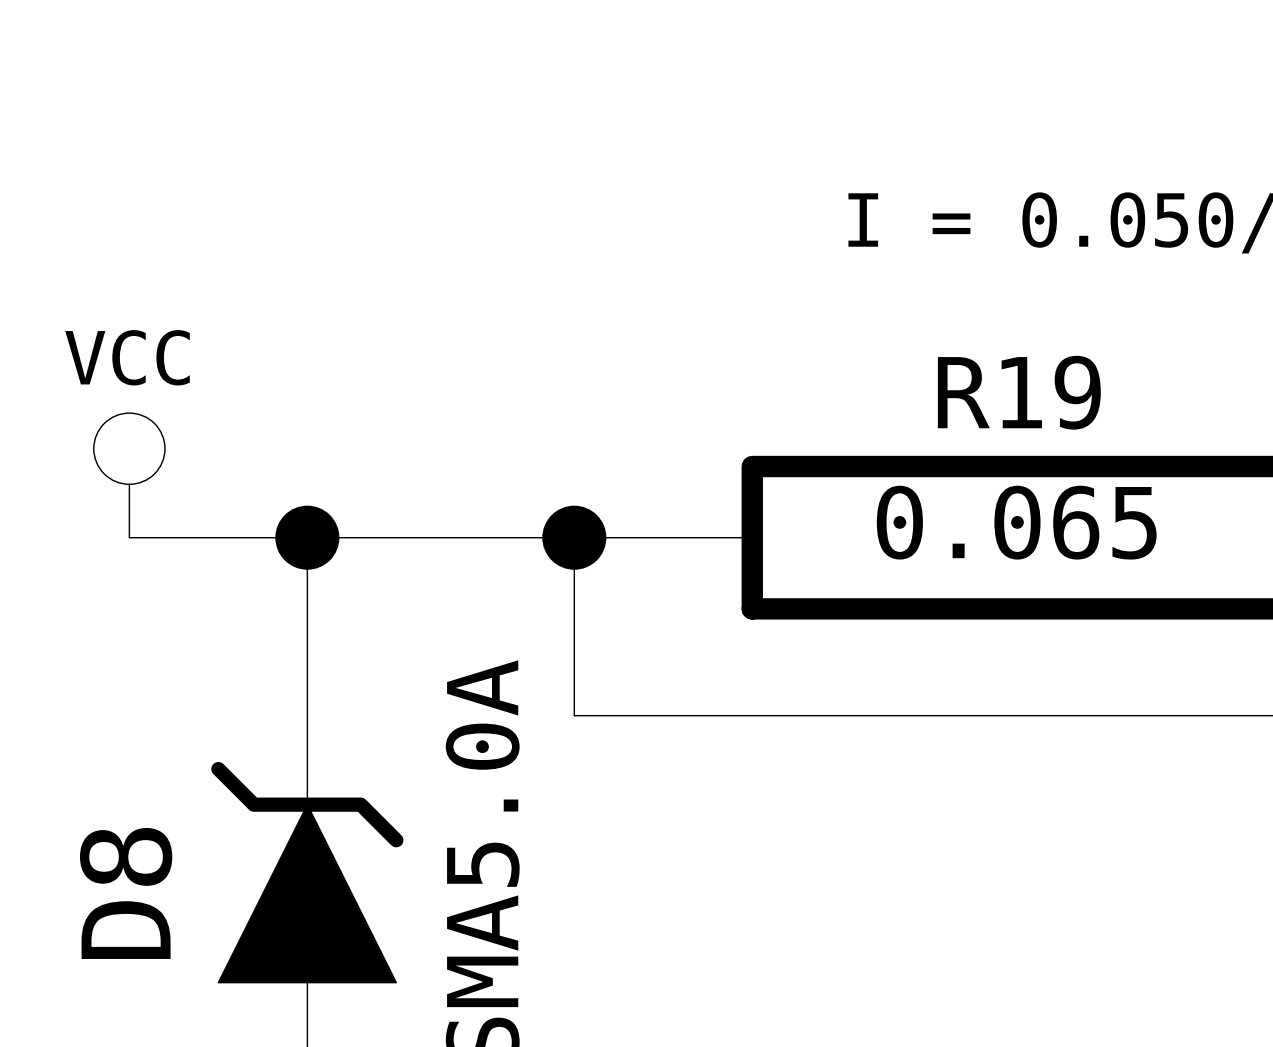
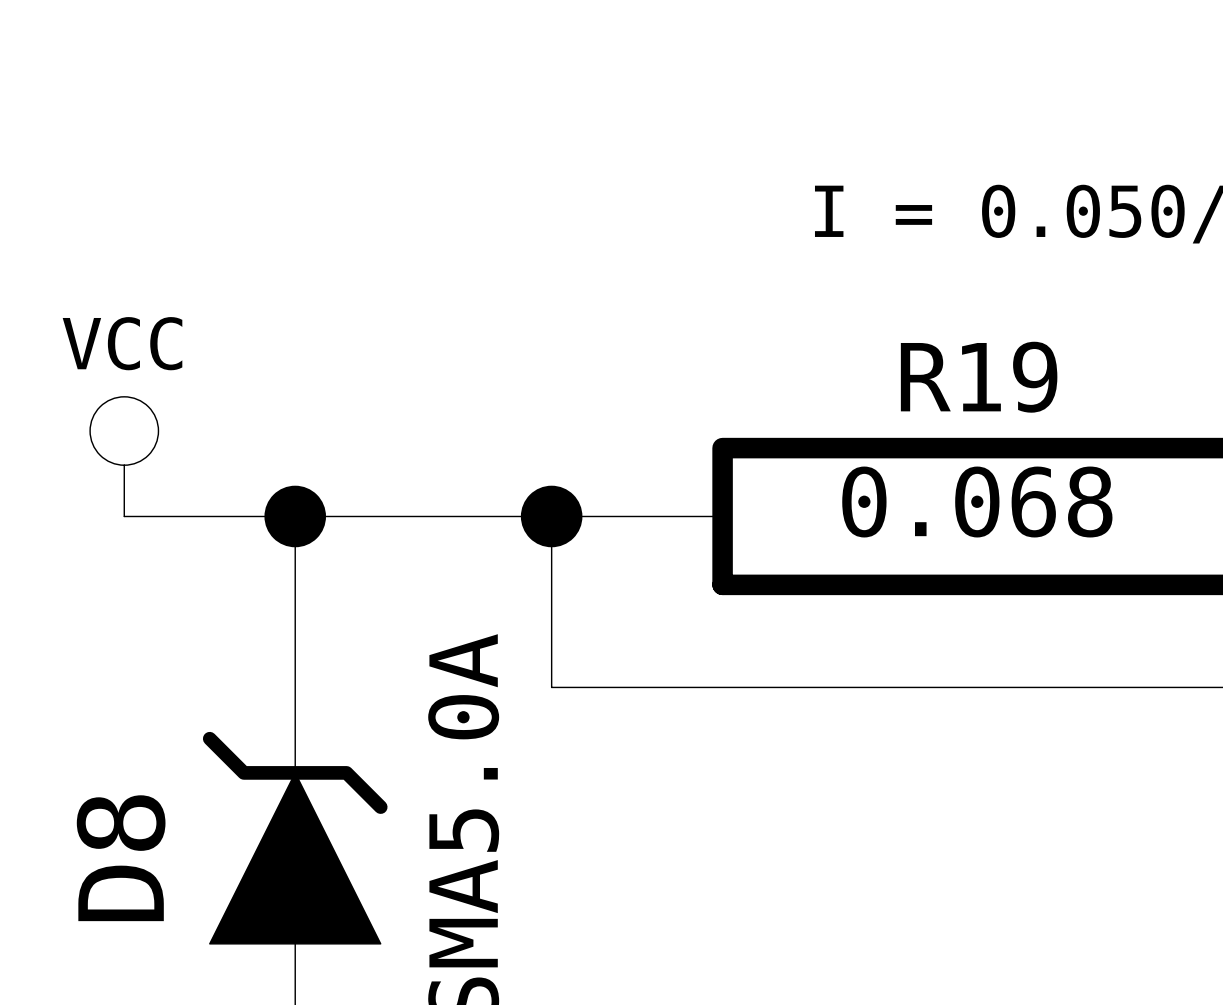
R19 value: 0.065 (1016, 522) -> 0.068 (977, 502)

